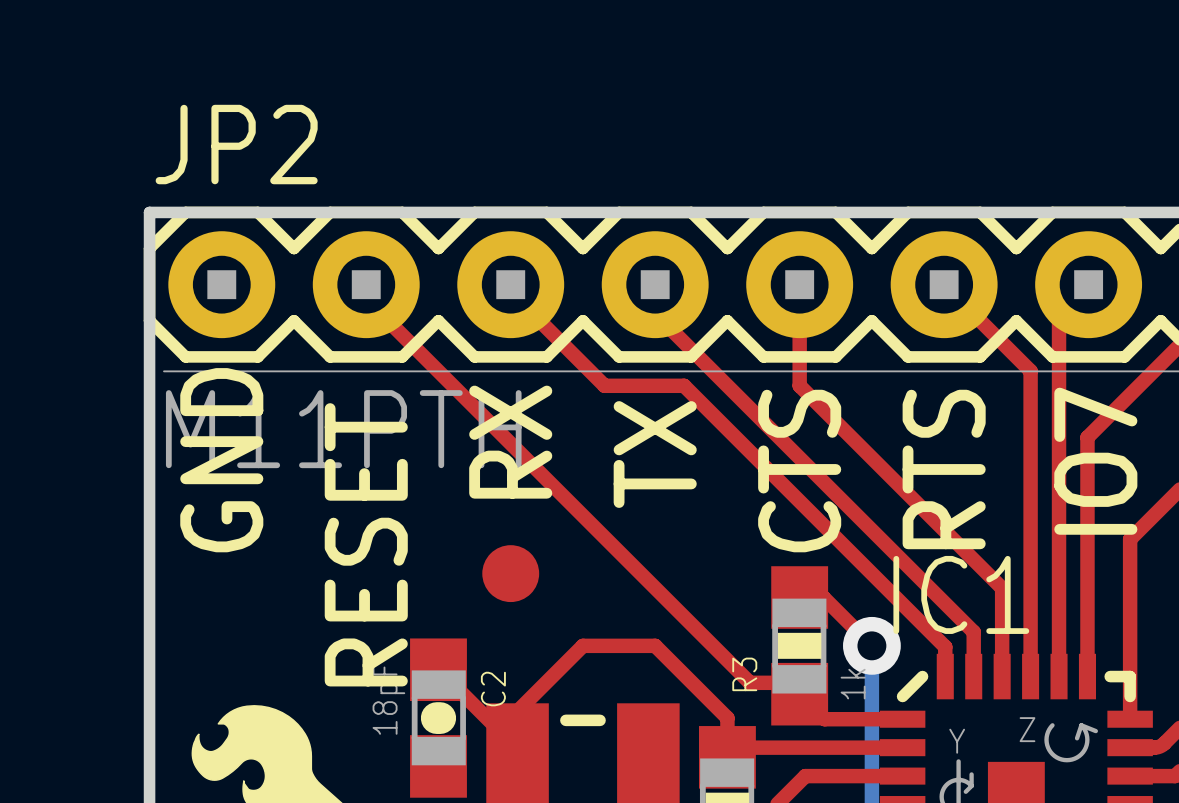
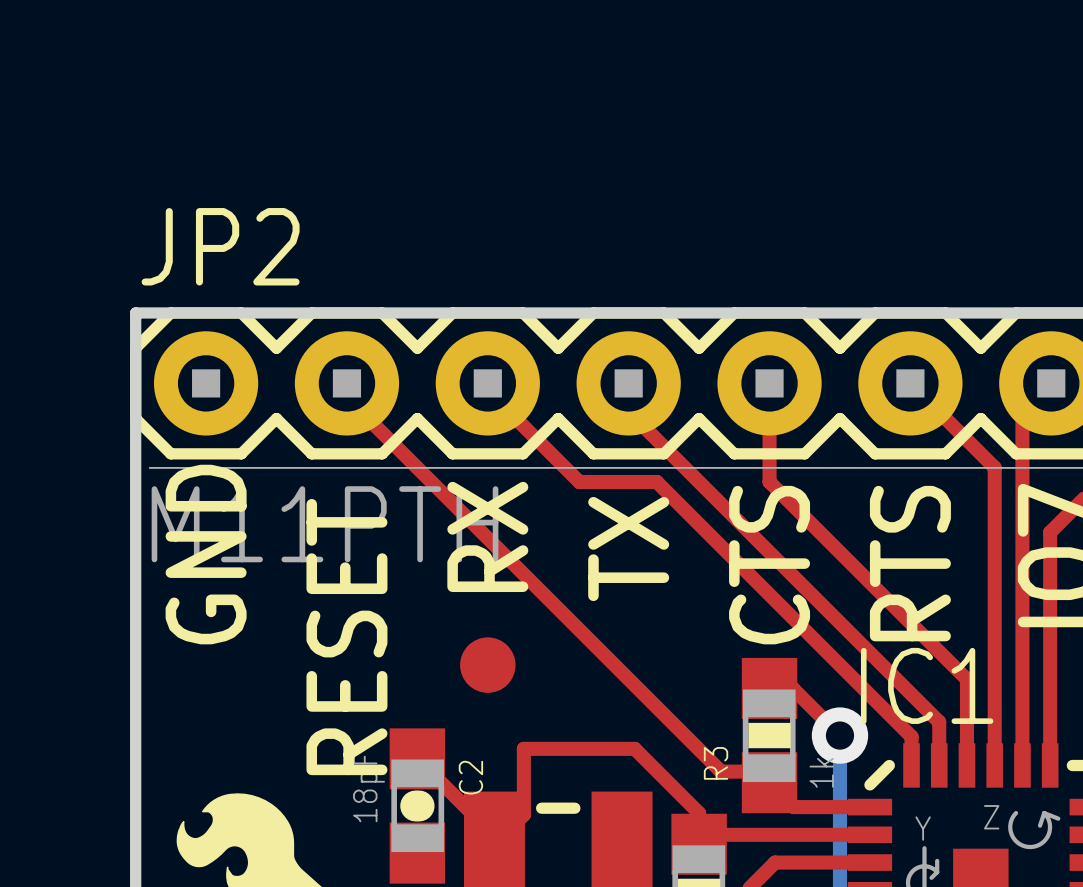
top track: (727, 725) (727, 718) (655, 645) (582, 645) (498, 730) -> (699, 813) (634, 748) (523, 748) (523, 814) (494, 844)

